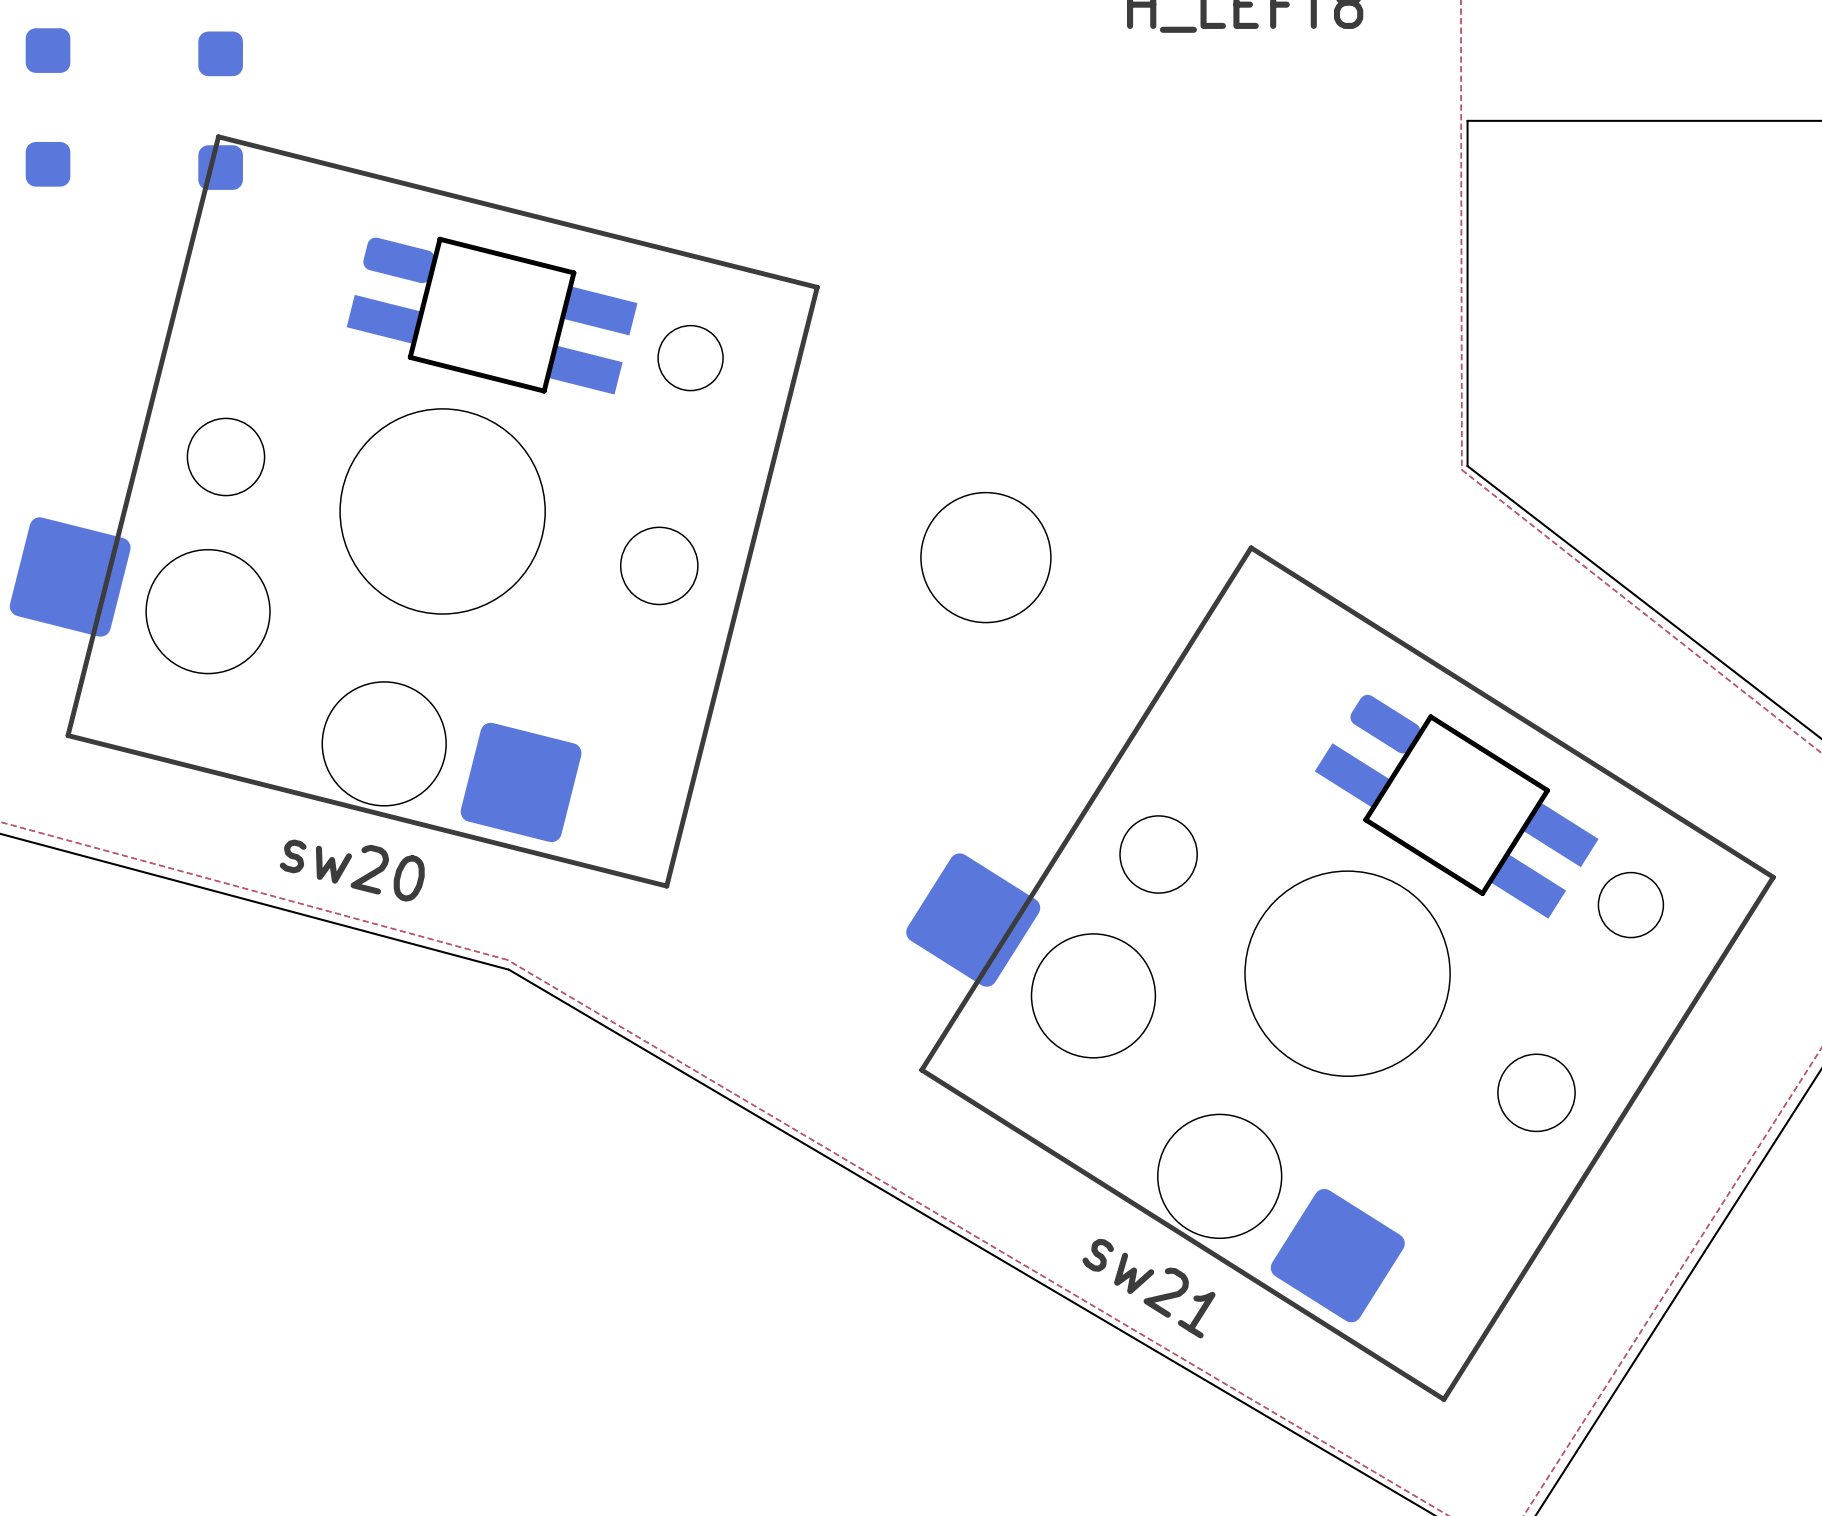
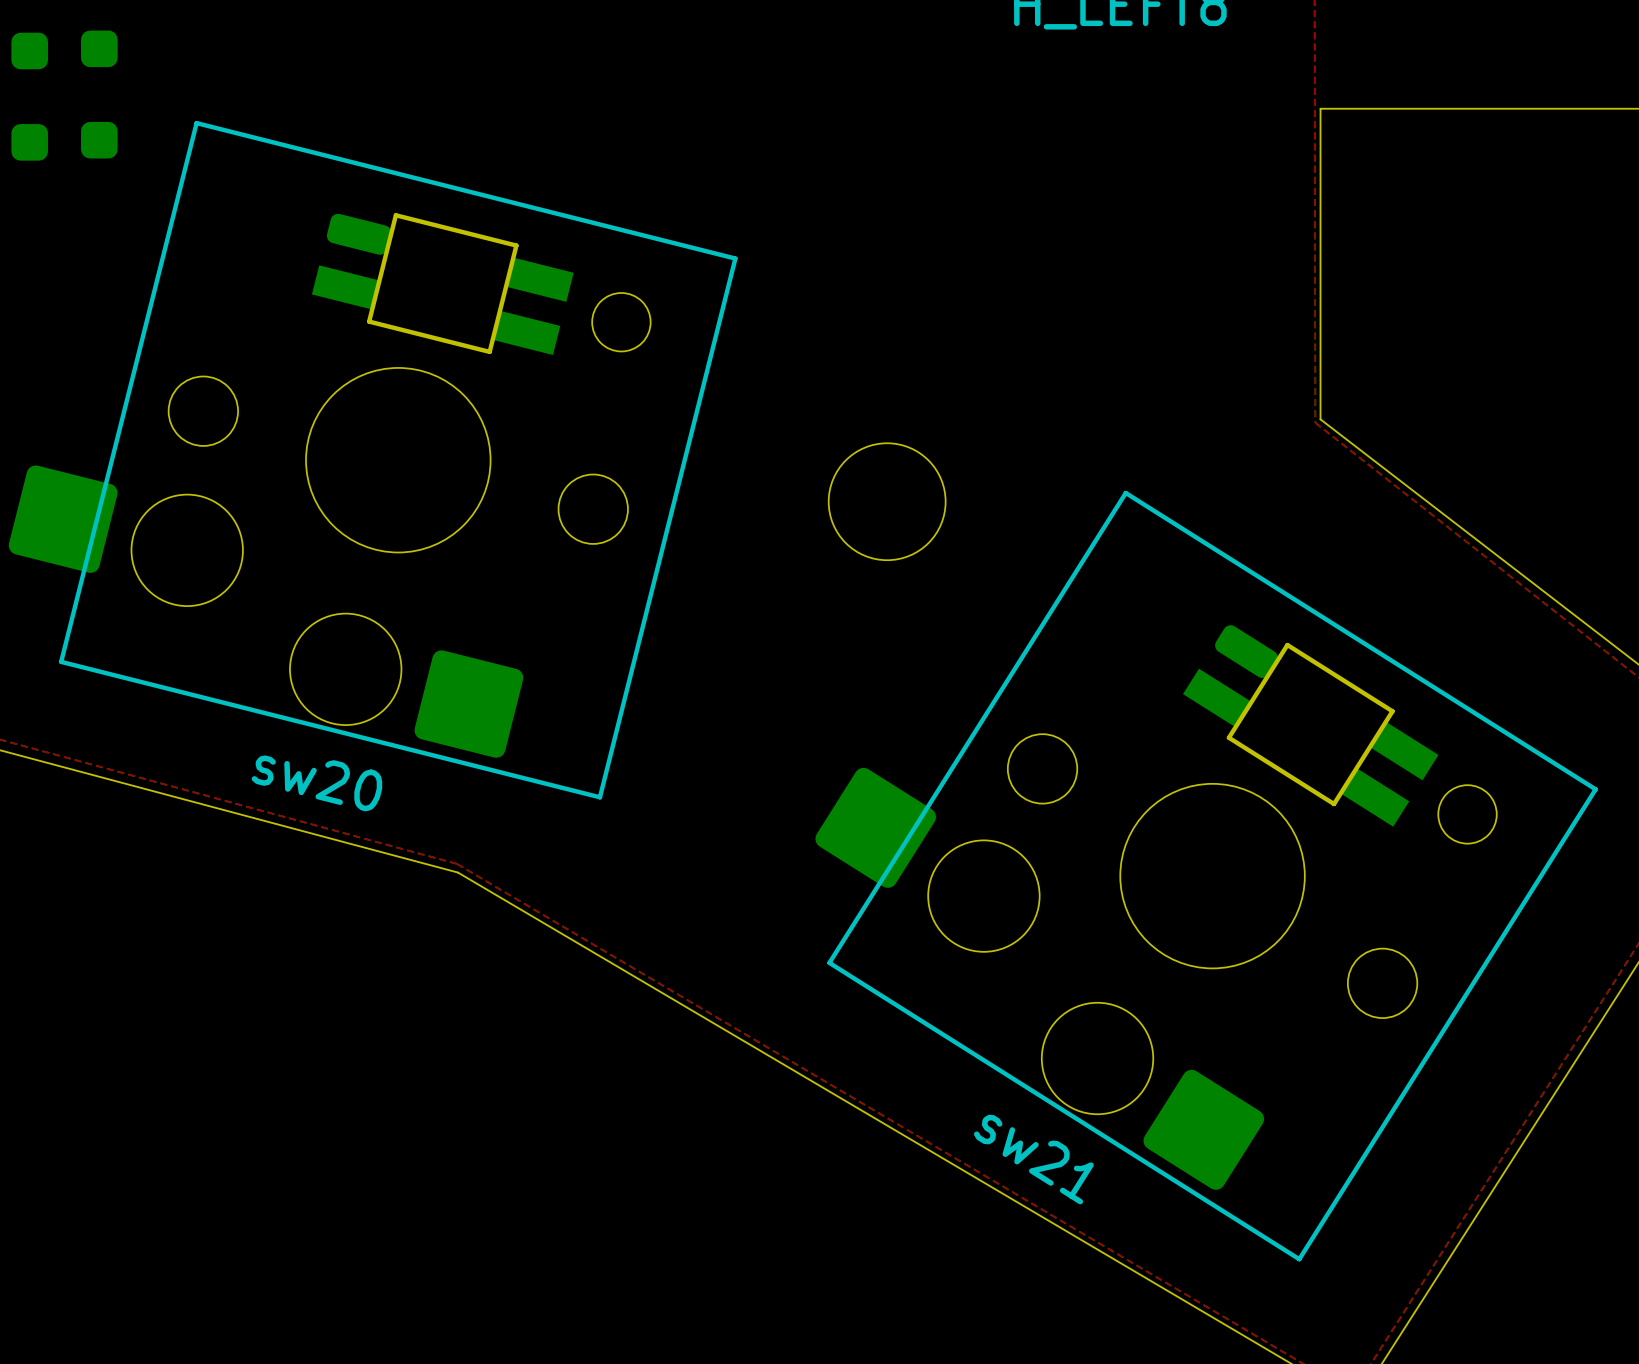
part footprint: [25, 28, 71, 187] -> [11, 32, 48, 161]
part: none -> (99, 94)
part: (220, 110) -> none

